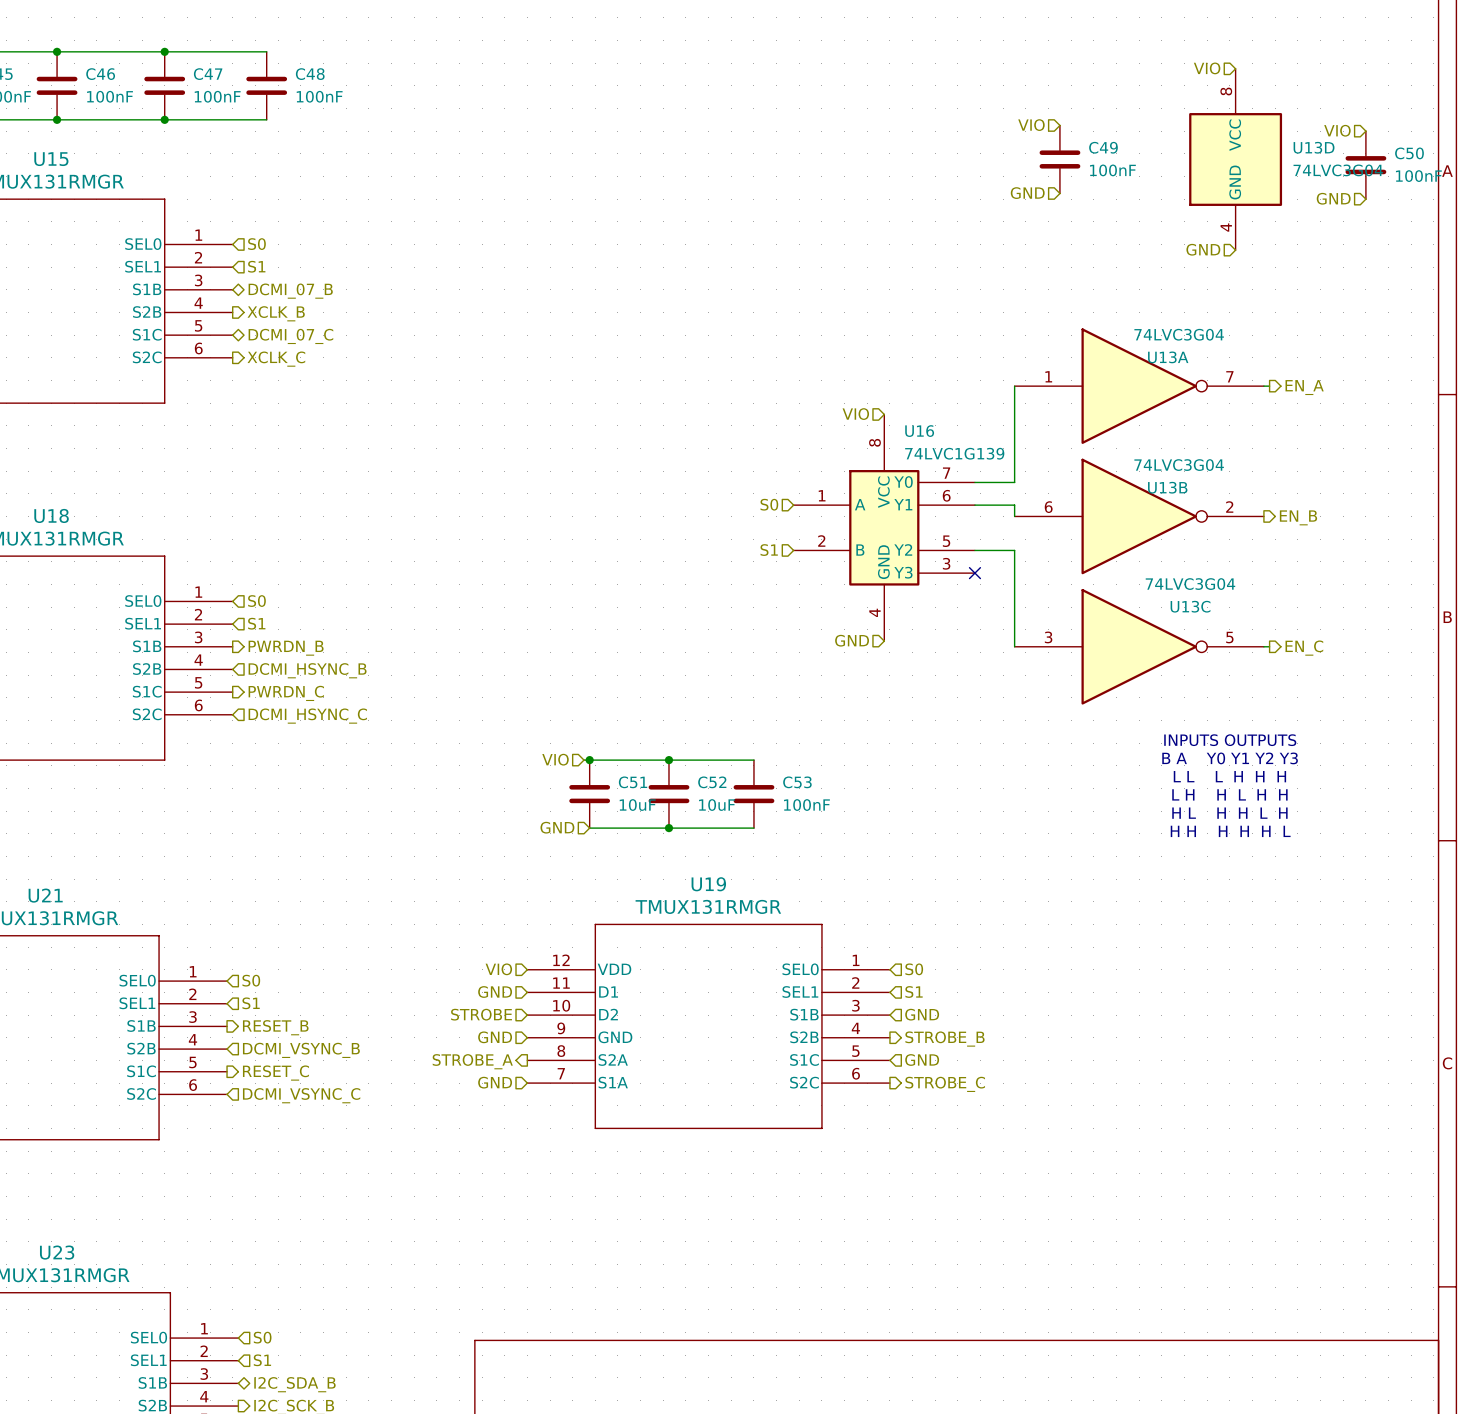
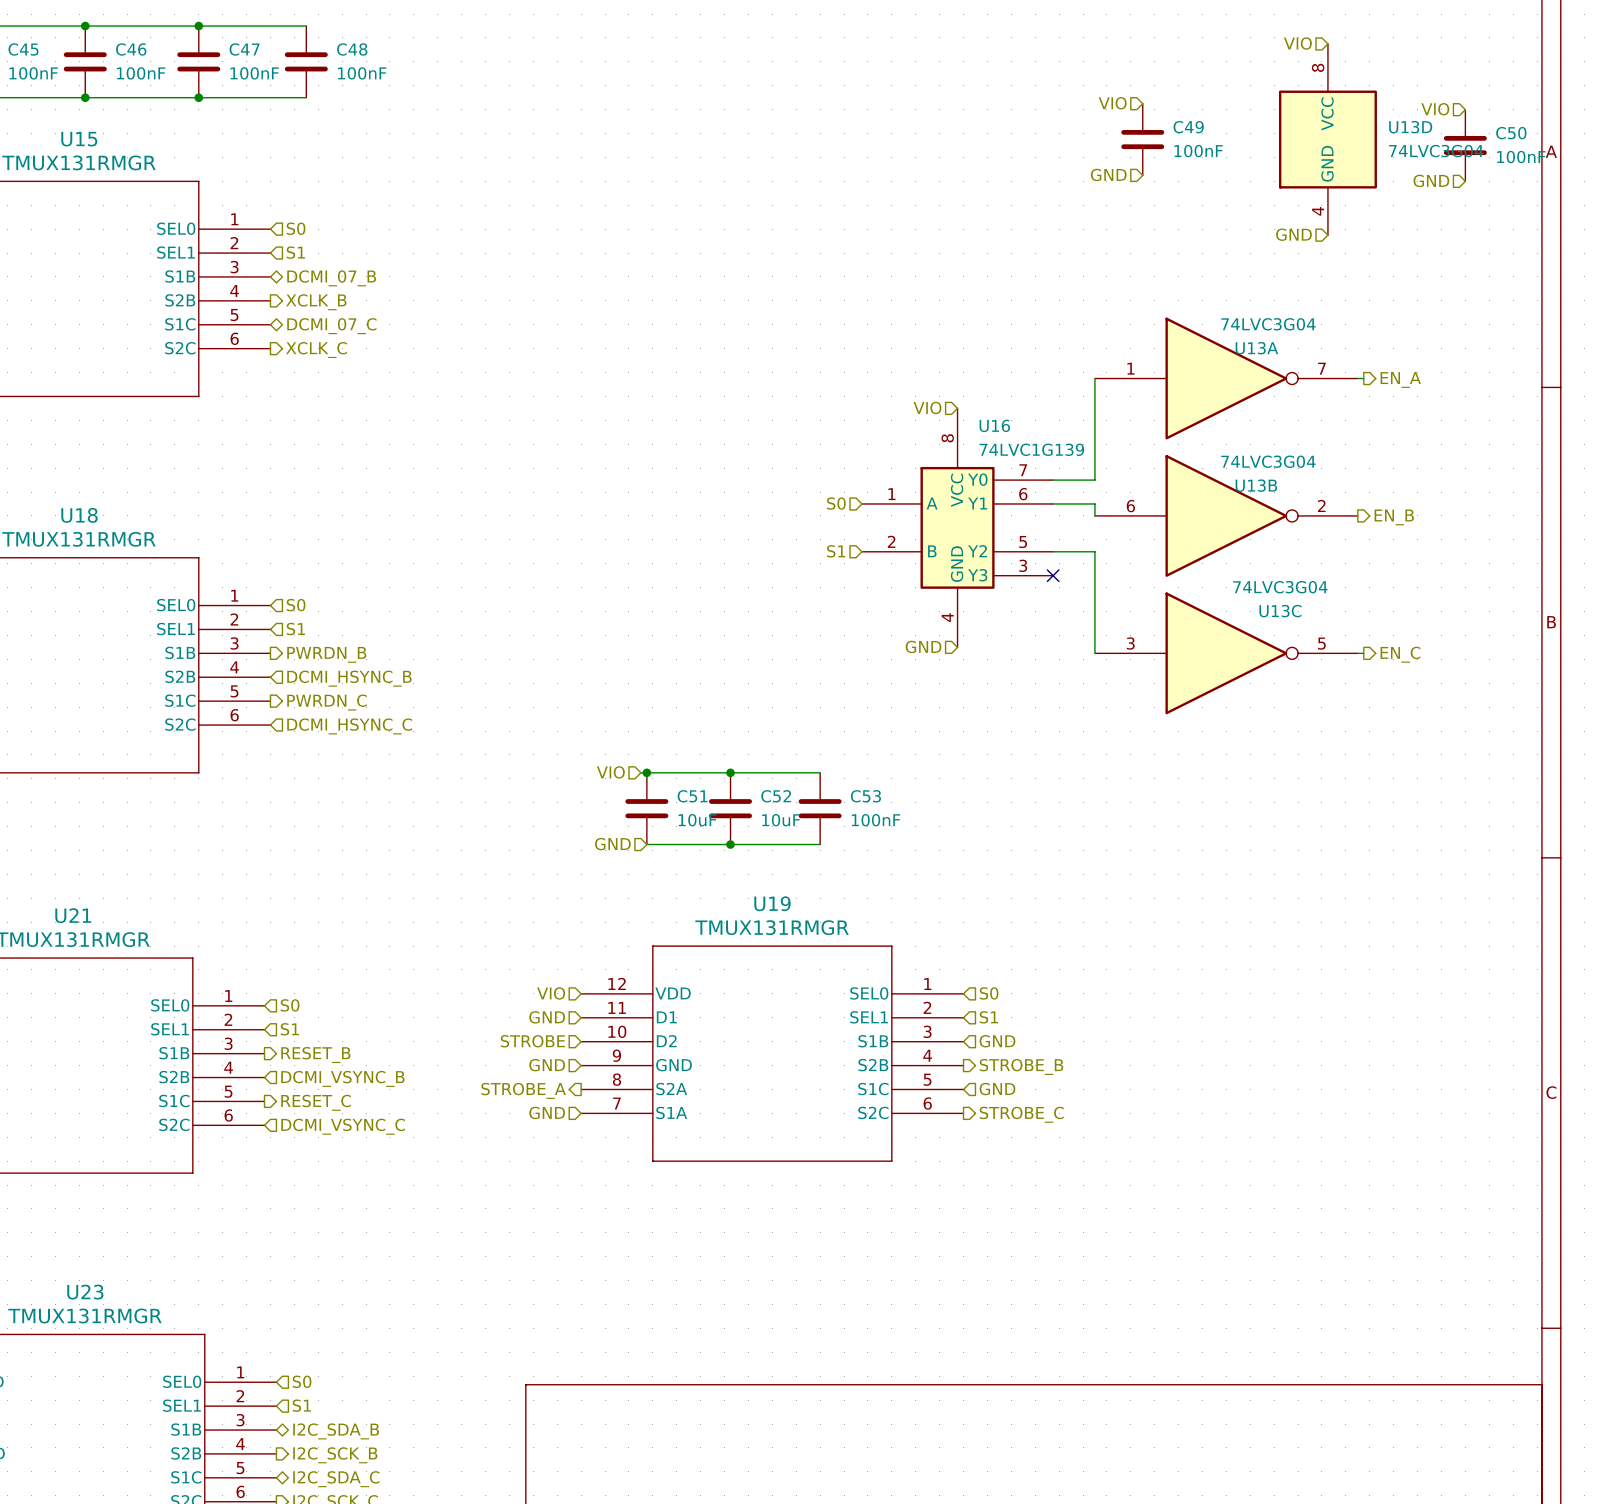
text: INPUTS OUTPUTS (1230, 740) -> none
text: B A Y0 Y1 Y2 Y3 (1230, 758) -> none
text: L L L H H H (1229, 776) -> none
text: L H H L H H (1229, 794) -> none
text: H L H H L H (1229, 813) -> none
text: H H H H H L (1230, 831) -> none

